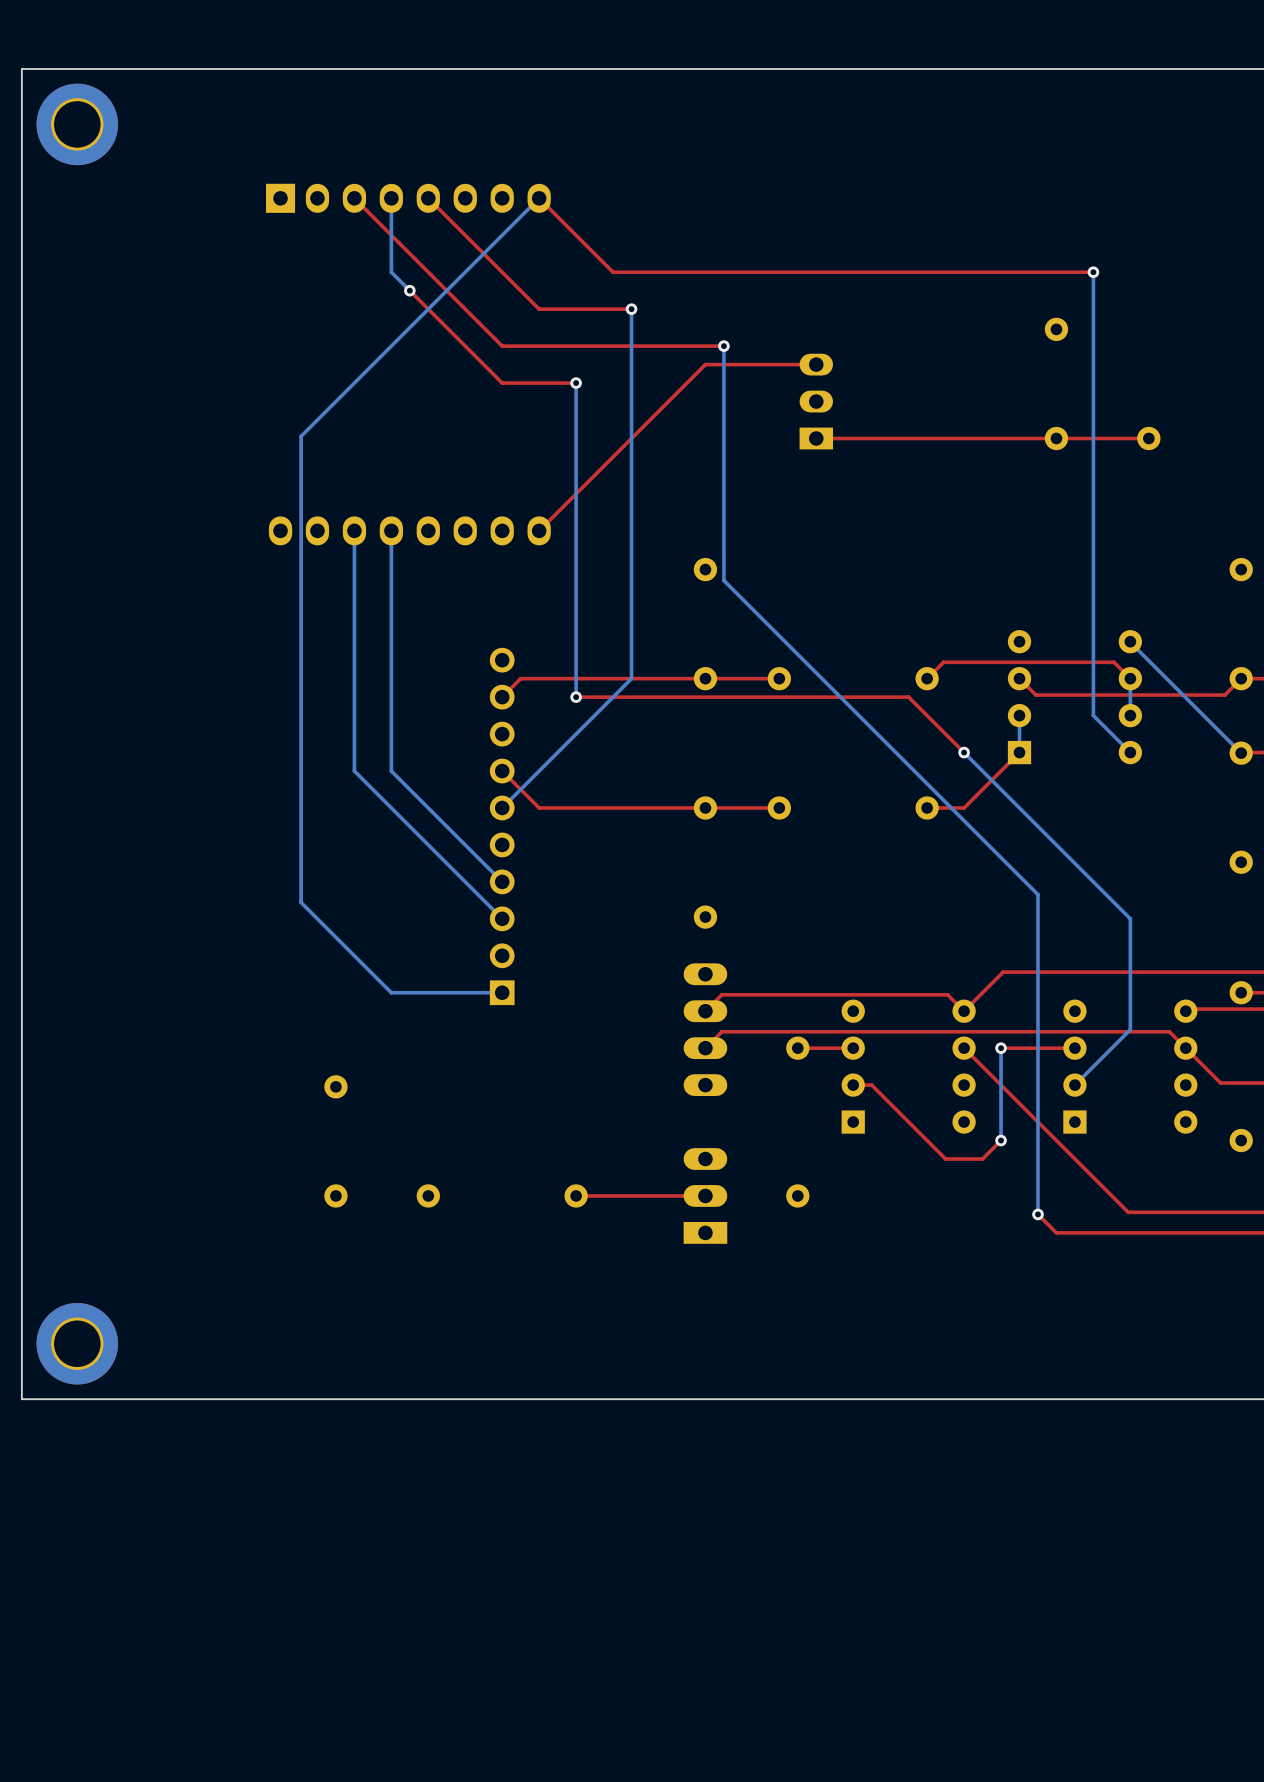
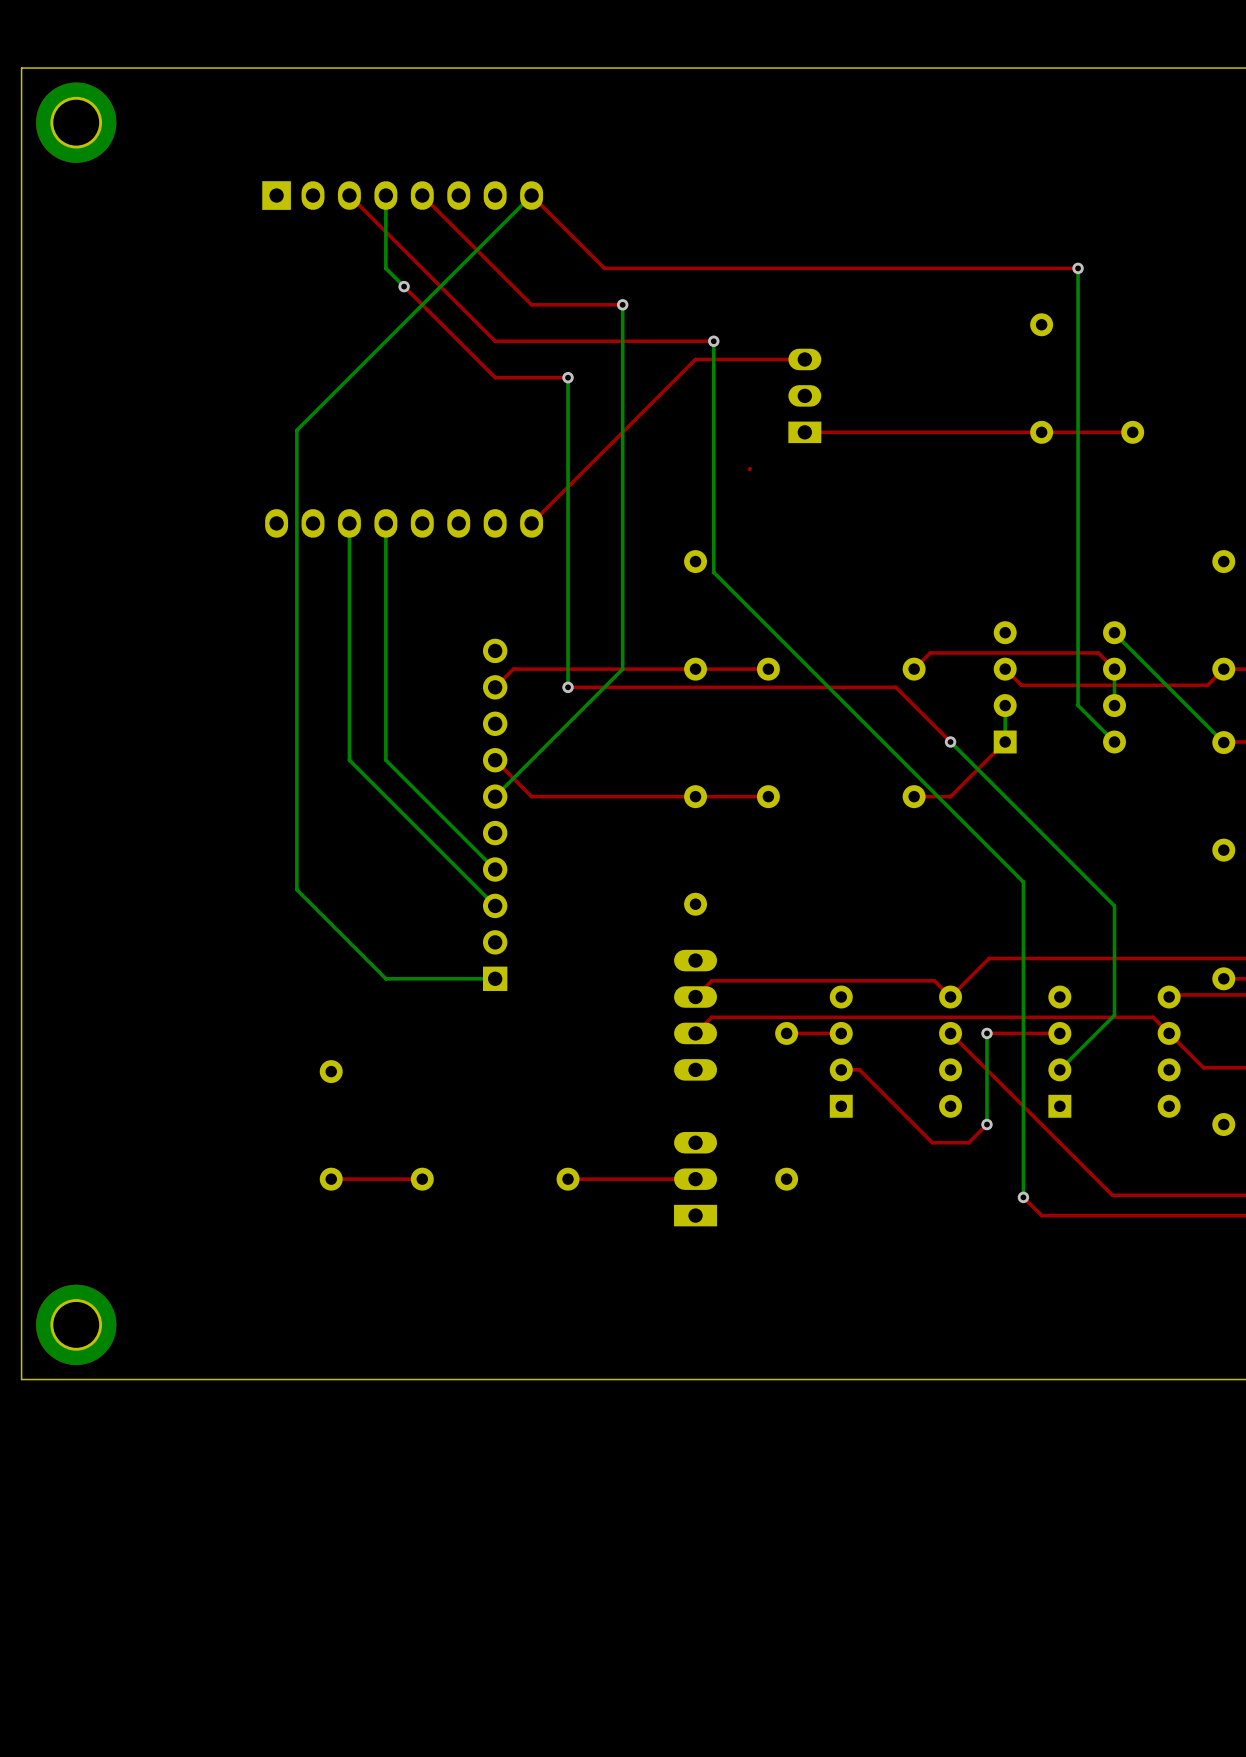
top track: none -> (750, 468) (749, 469)
top track: none -> (422, 1179) (331, 1179)

